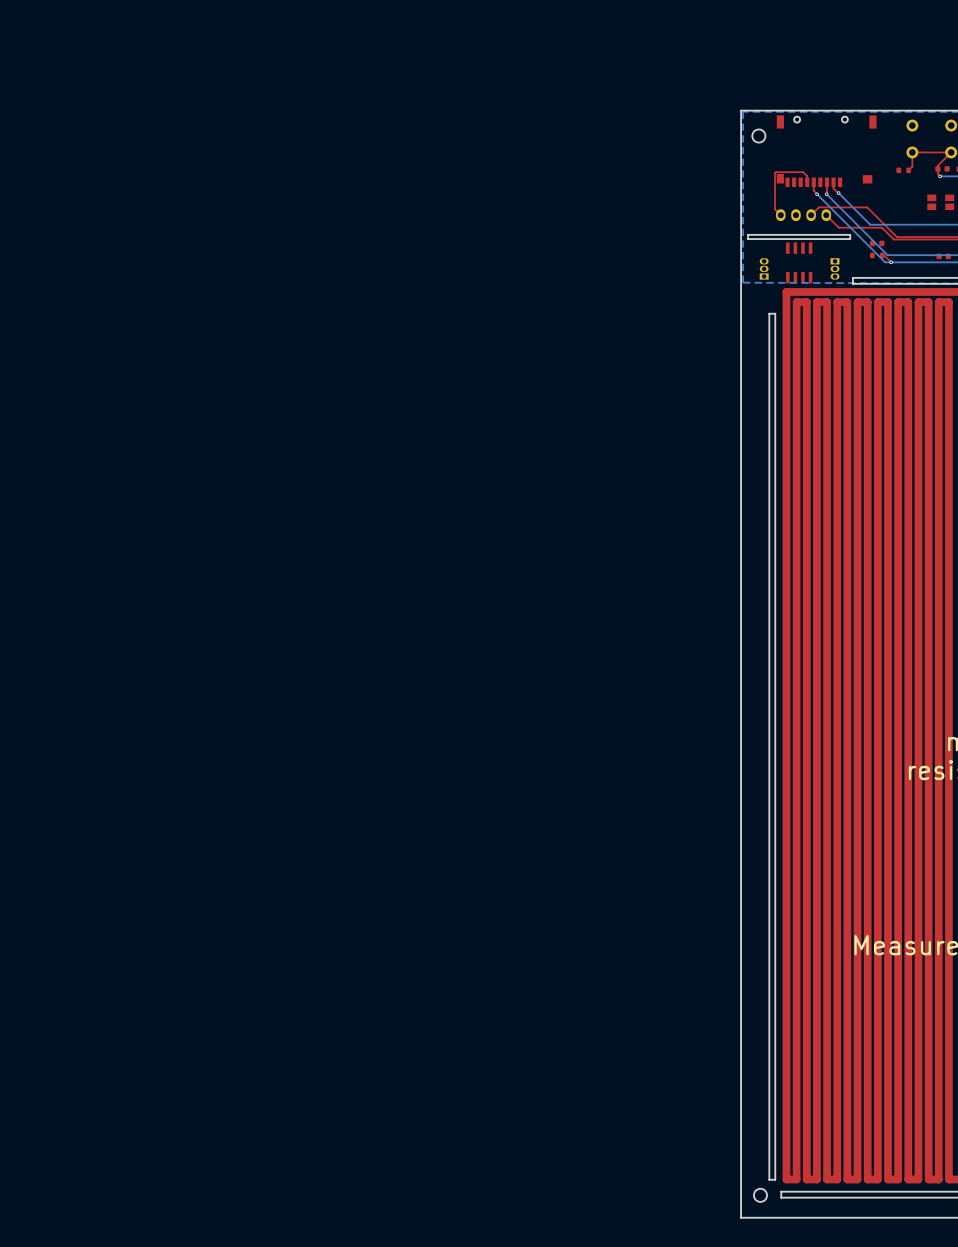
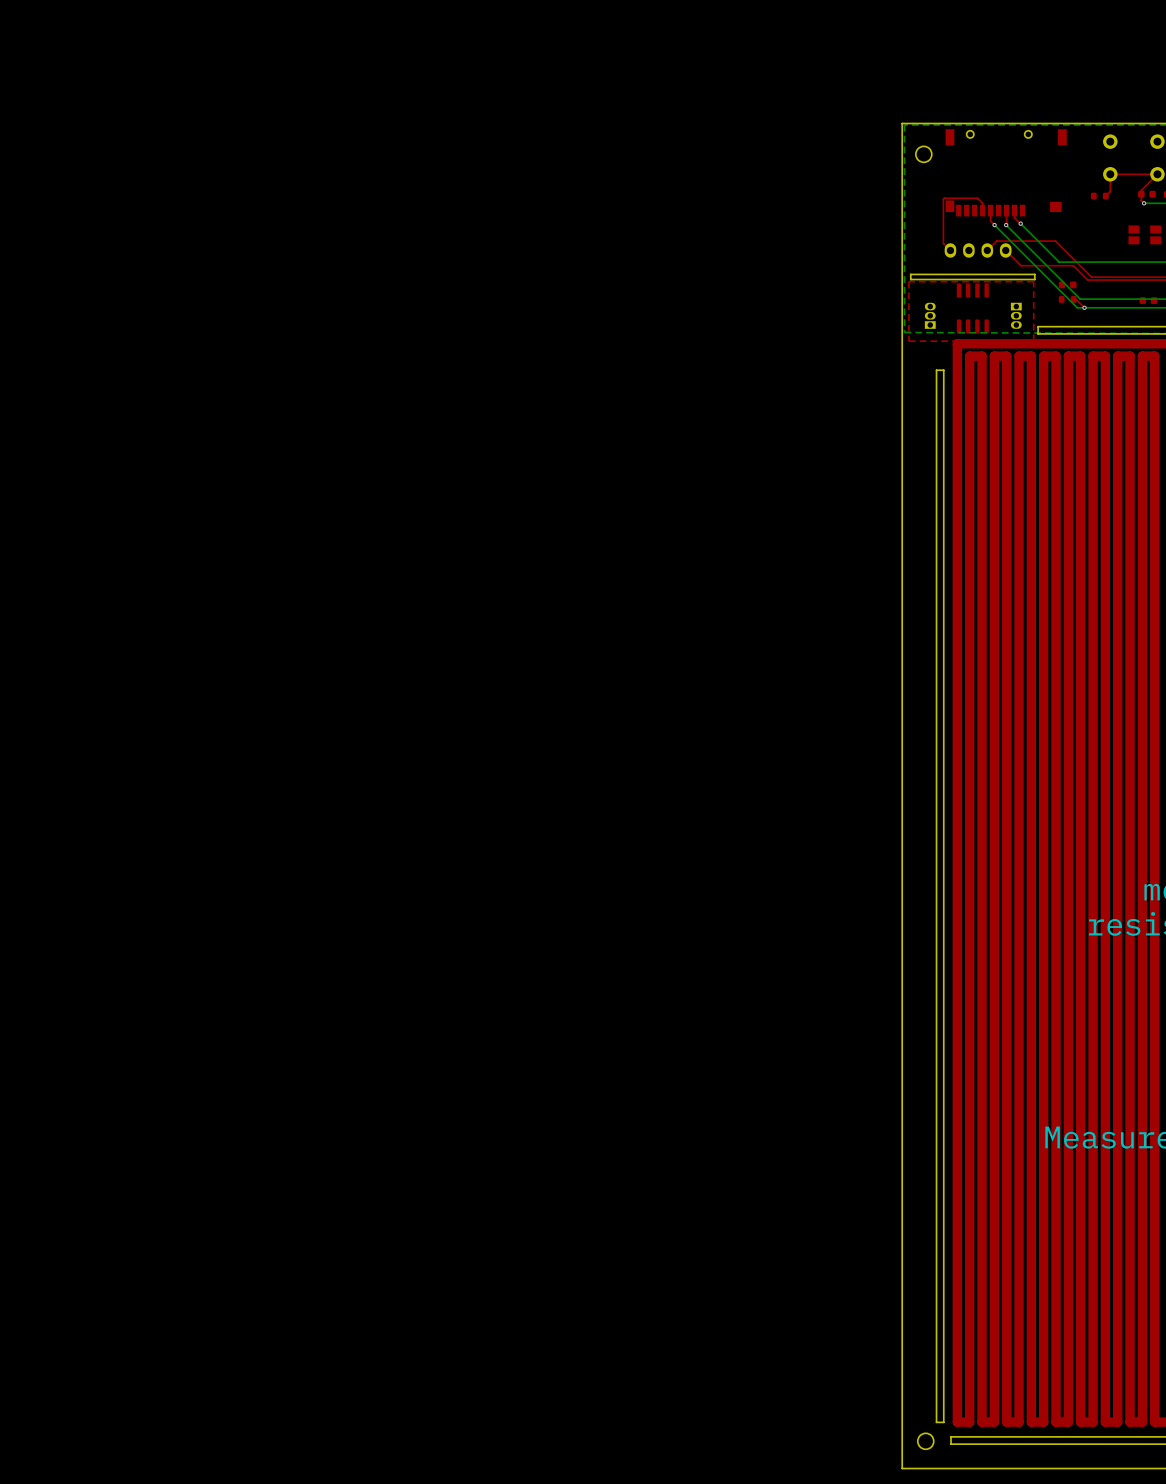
top zone outline: none -> (1033, 281) (1033, 341) (908, 341) (908, 281) (1033, 281)

